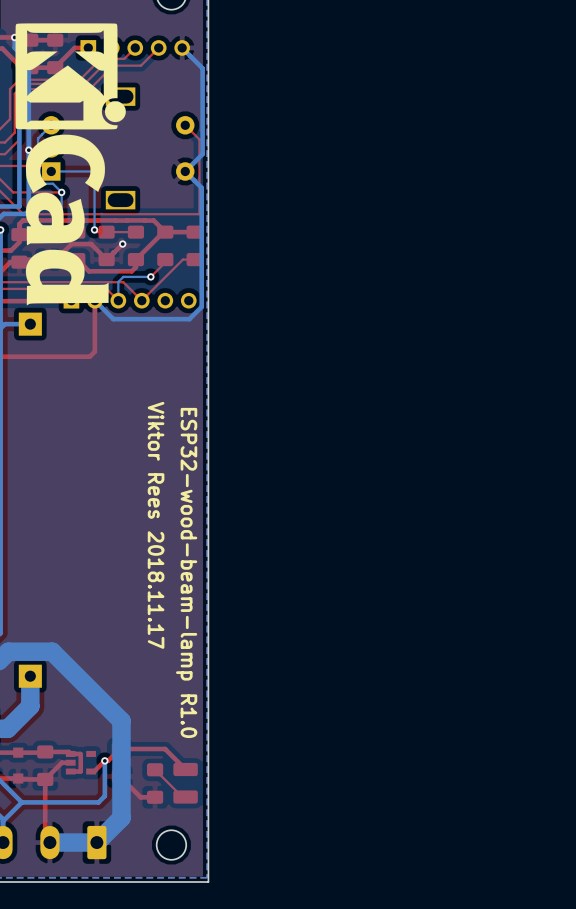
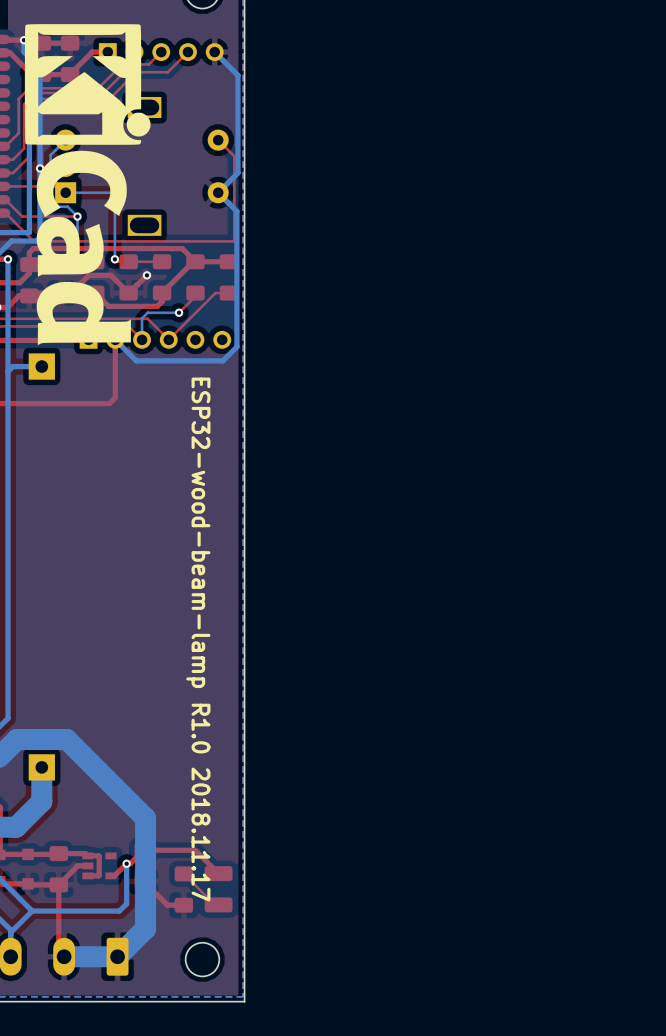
text: Viktor Rees 2018.11.17 (156, 525) -> none
text: ESP32-wood-beam-lamp R1.0 (186, 572) -> ESP32-wood-beam-lamp R1.0 2018.11.17 (198, 639)

